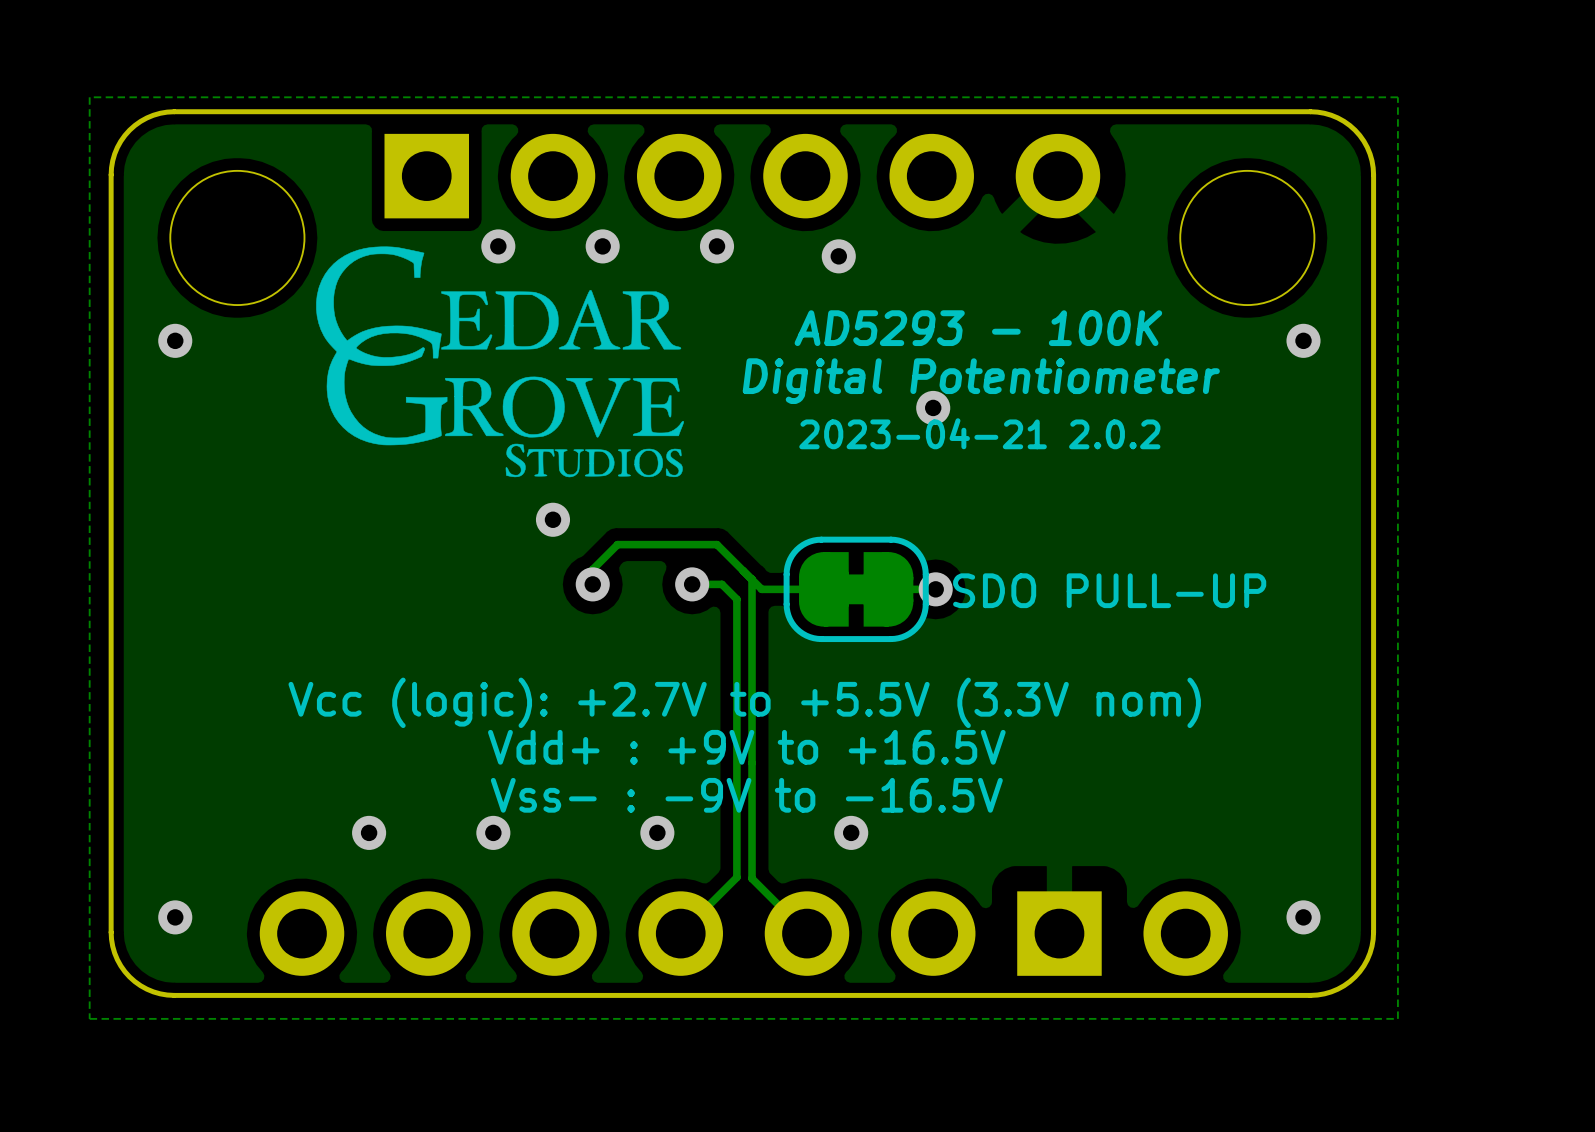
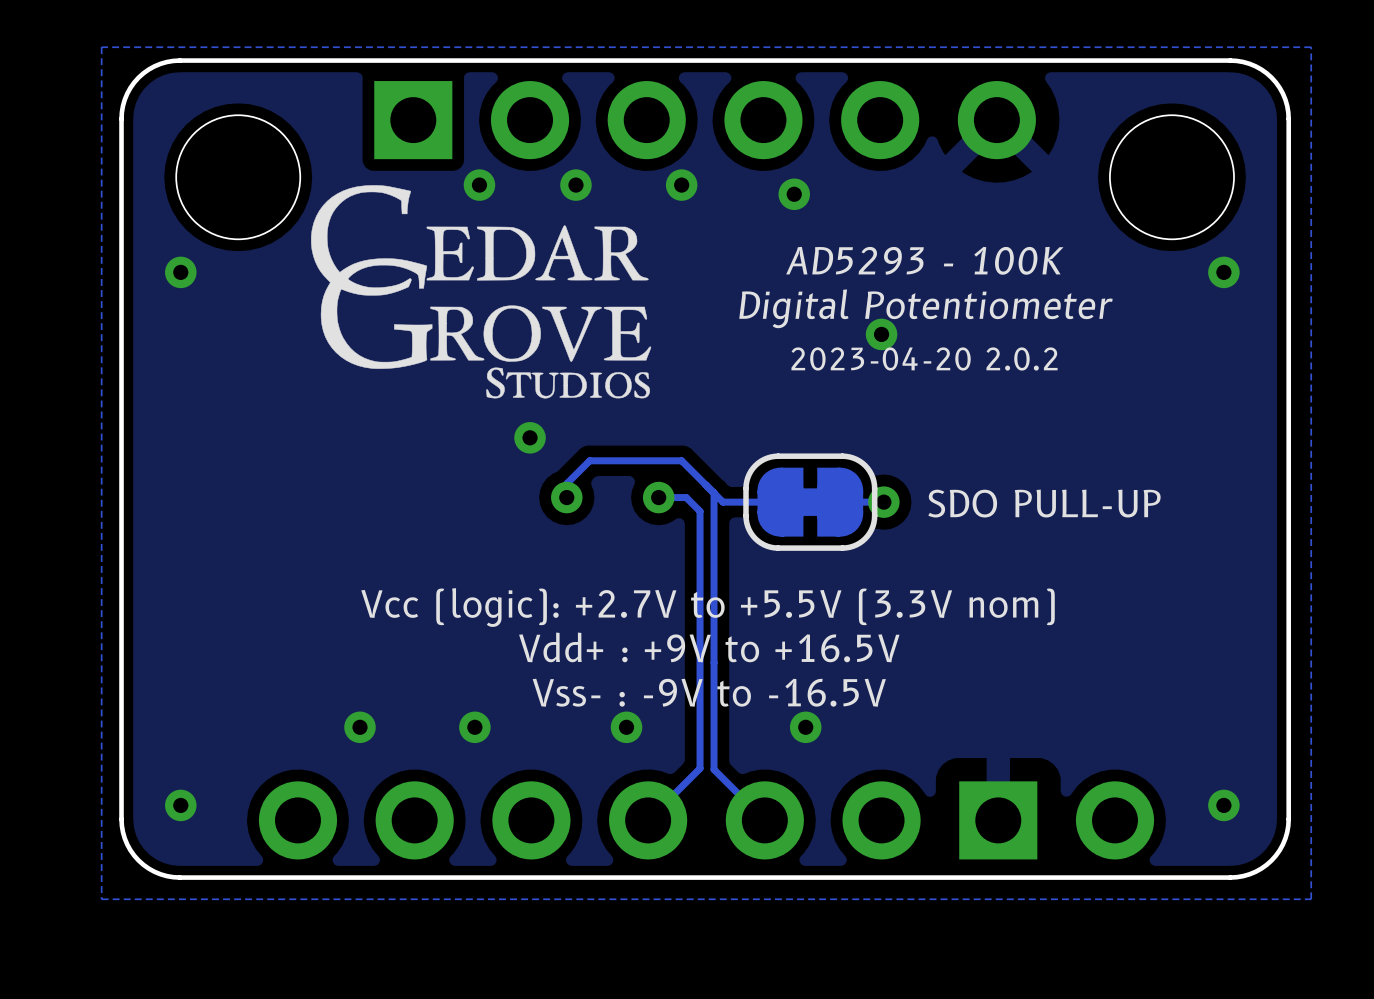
text: 2023-04-21 2.0.2 (979, 433) -> 2023-04-20 2.0.2 (924, 358)

